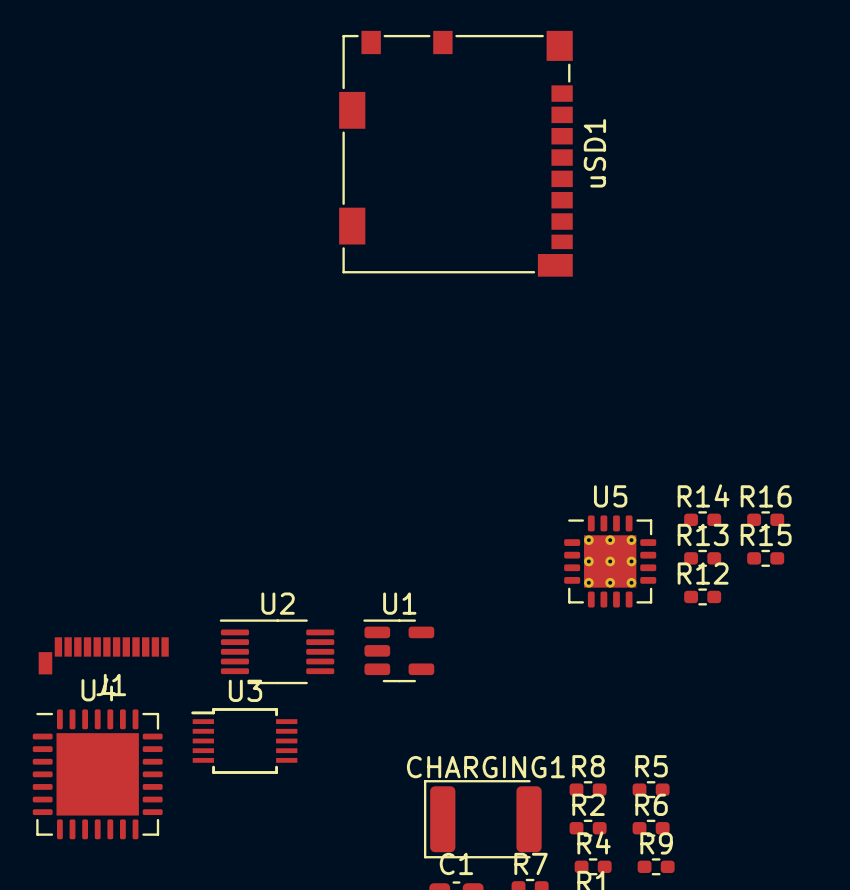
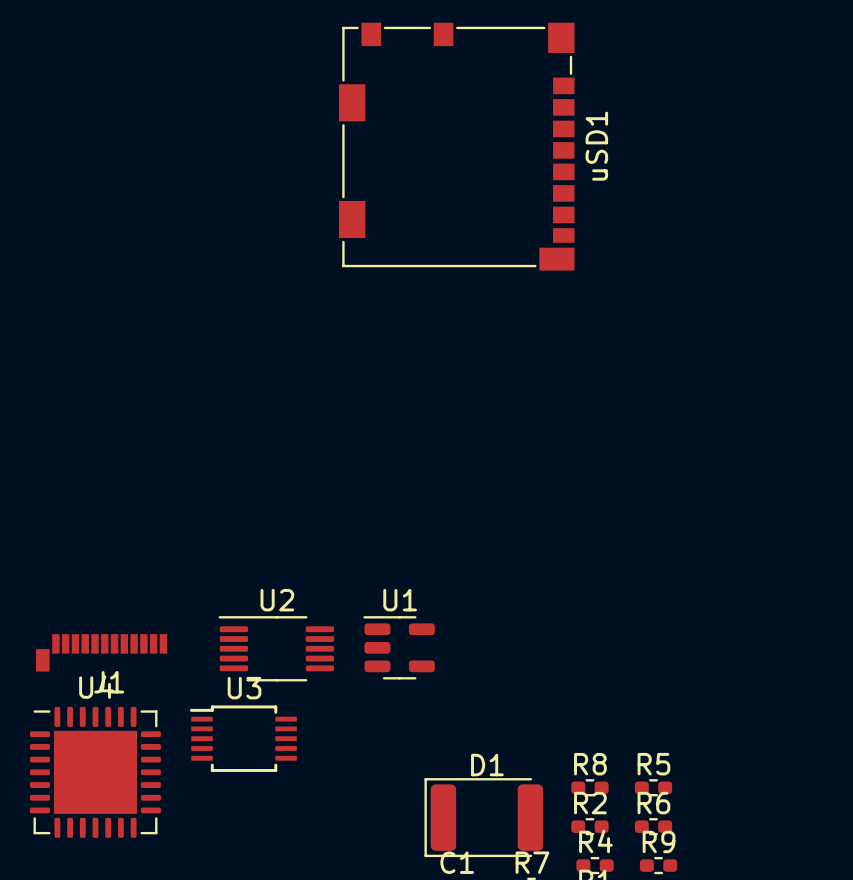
R14: (702, 519) -> none
R16: (765, 519) -> none
R13: (702, 558) -> none
R15: (765, 558) -> none
U5: (610, 561) -> none
R12: (702, 596) -> none
CHARGING1 name: CHARGING1 (485, 767) -> D1 (487, 765)

